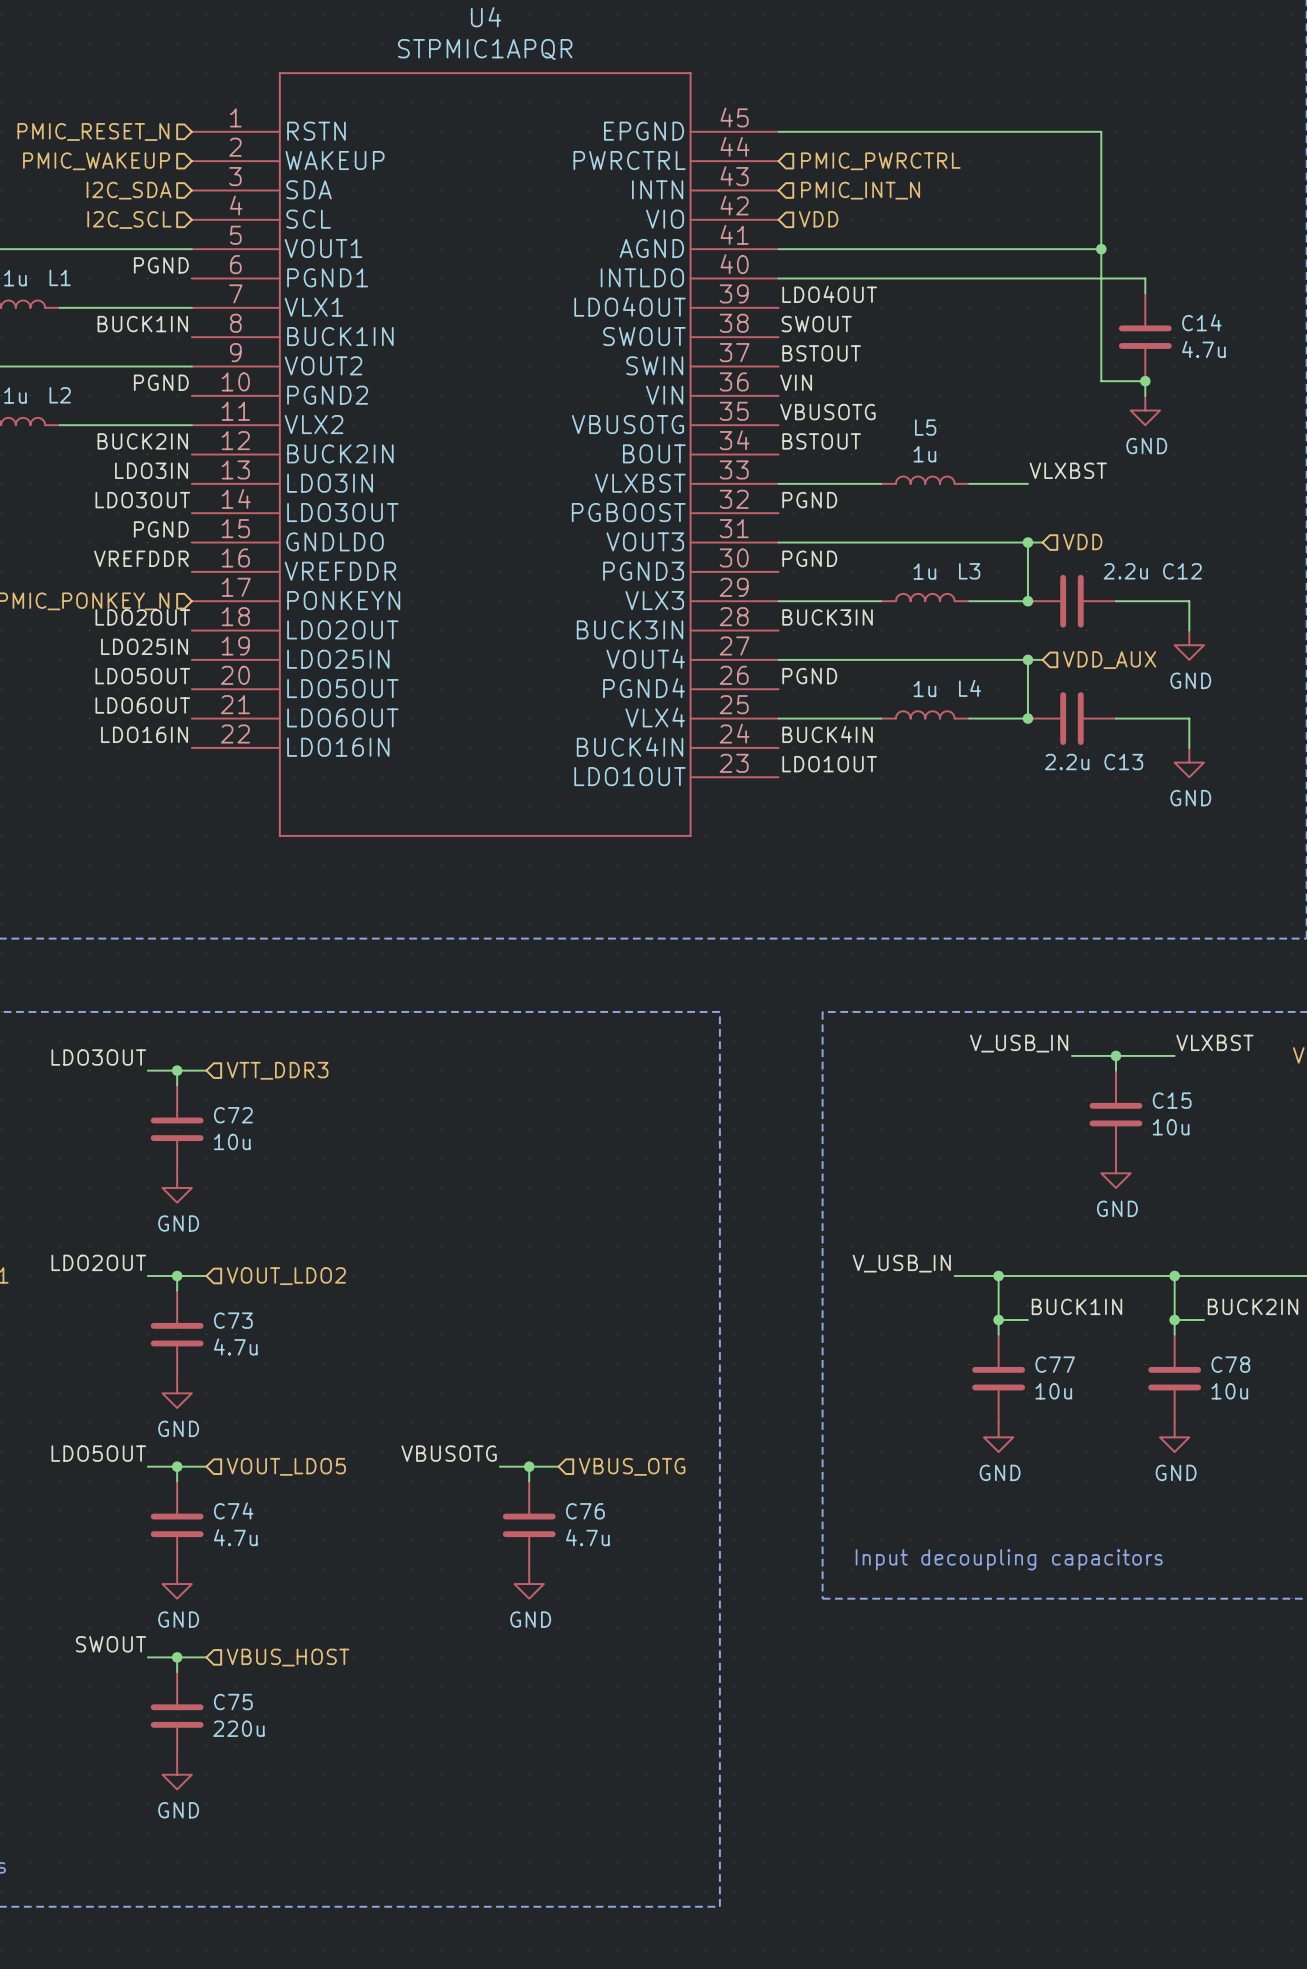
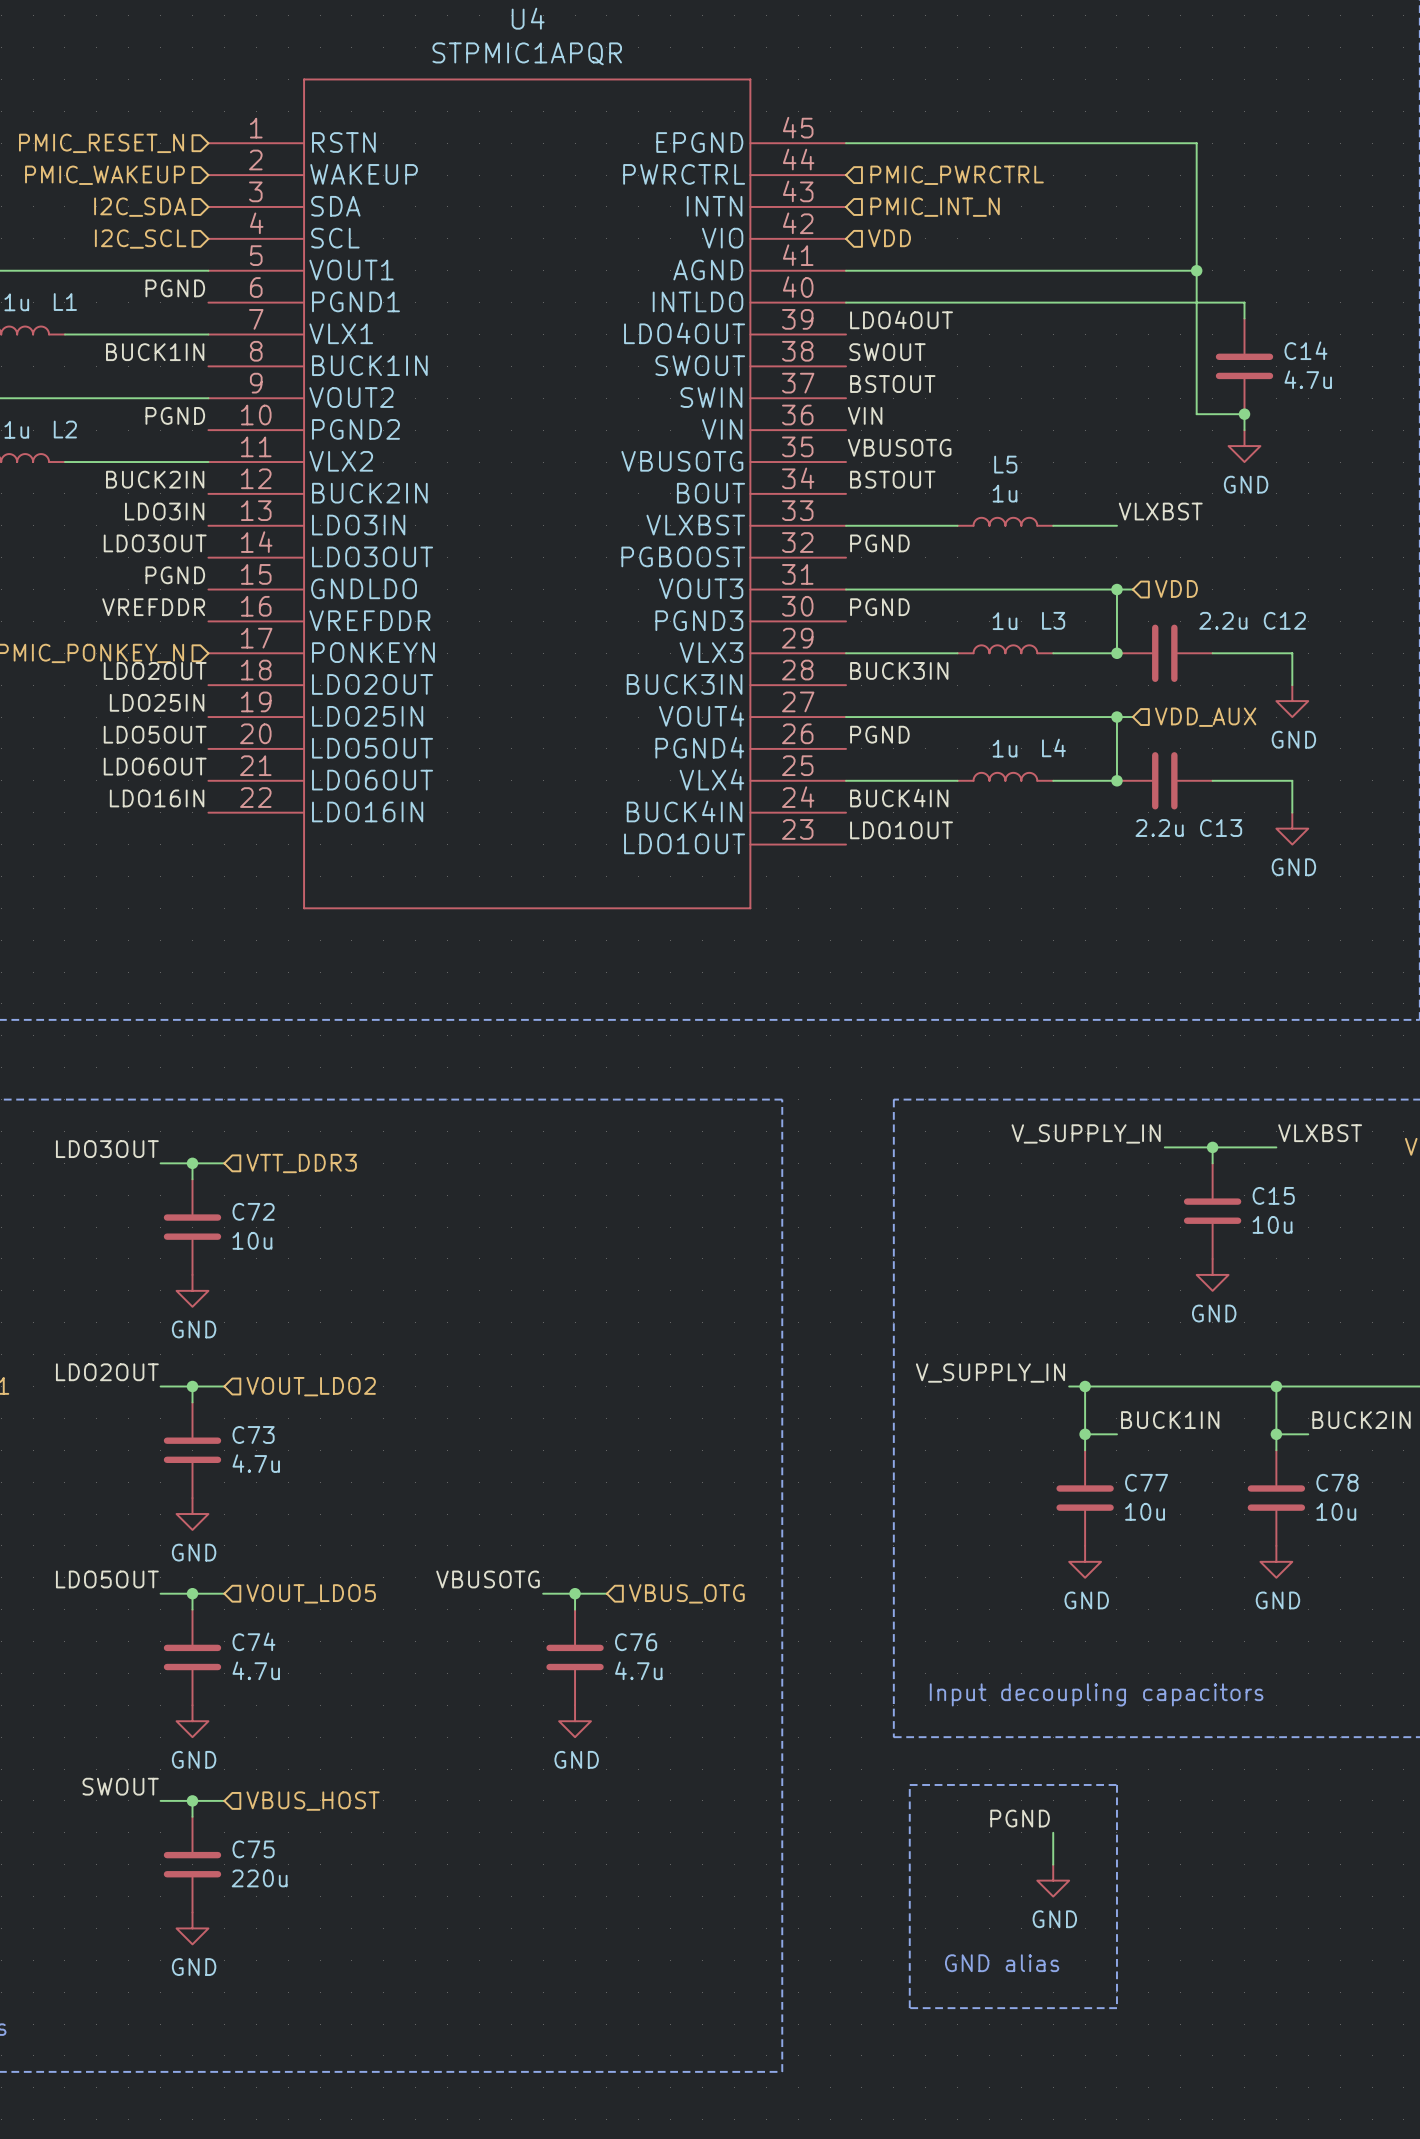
label: V_USB_IN (1019, 1043) -> V_SUPPLY_IN (1086, 1133)
label: V_USB_IN (901, 1263) -> V_SUPPLY_IN (990, 1373)
wire: (954, 1275) (983, 1275) -> none
line: none -> (909, 1784) (909, 2008) (1116, 2008) (1116, 1784) (909, 1784)
label: none -> PGND (1020, 1818)
wire: none -> (1053, 1832) (1053, 1864)
power symbol: none -> GND (1053, 1880)
text: none -> GND alias (1002, 1963)

